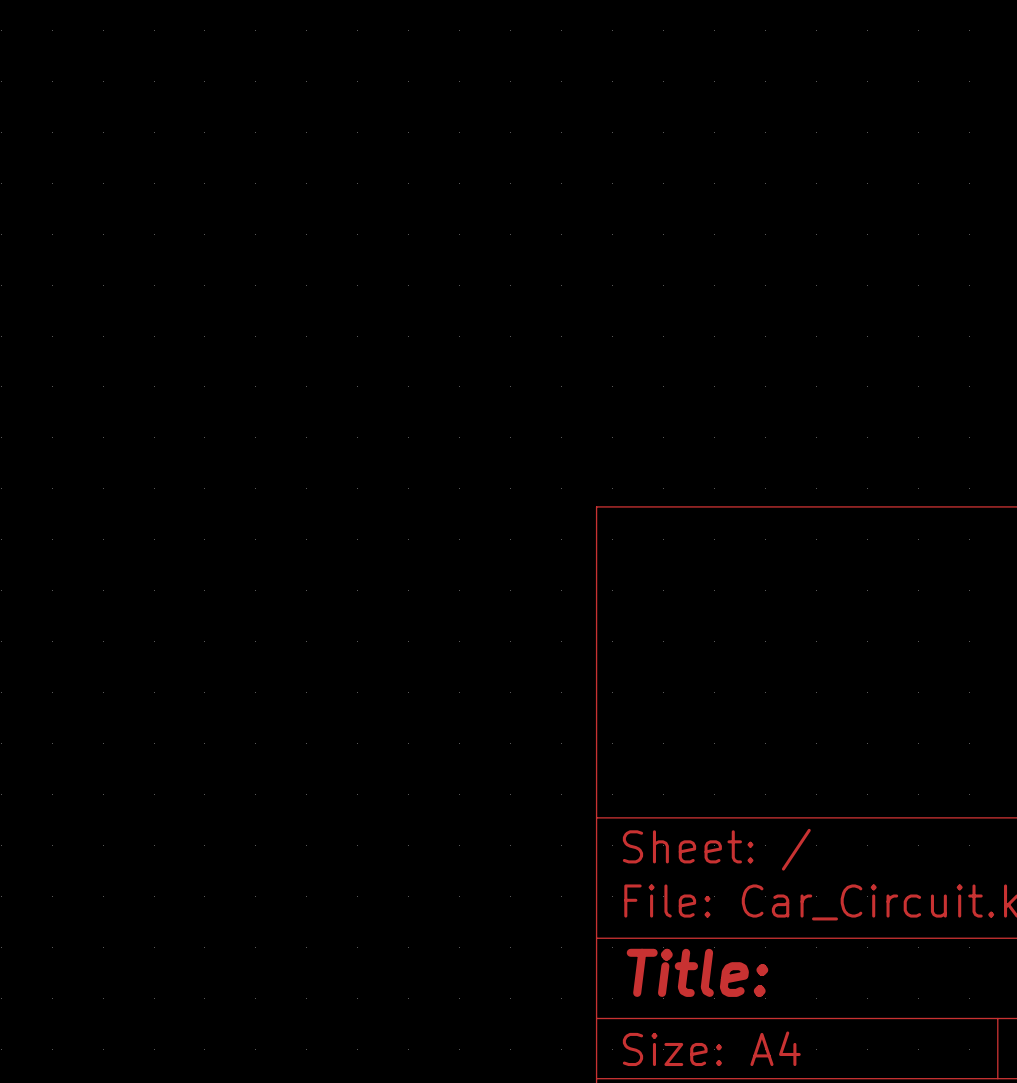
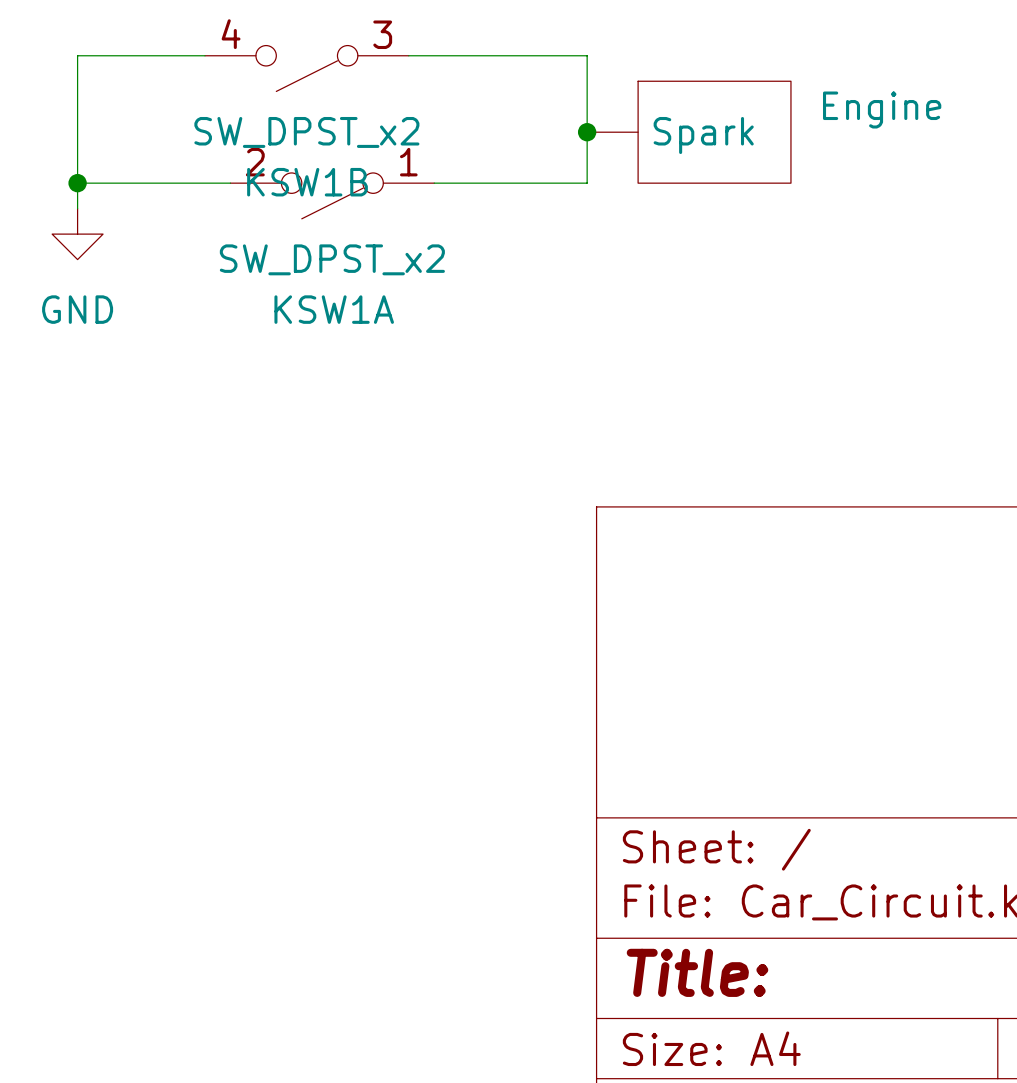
wire: none -> (204, 55) (77, 55) (77, 208)
wire: none -> (408, 55) (587, 55) (587, 183) (434, 183)
KSW1B: none -> SW_DPST_x2 (306, 68)
junction: none -> (587, 132)
Engine: none -> (689, 132)
wire: none -> (77, 183) (230, 183)
junction: none -> (77, 183)
KSW1A: none -> SW_DPST_x2 (332, 195)
power symbol: none -> GND (77, 234)

